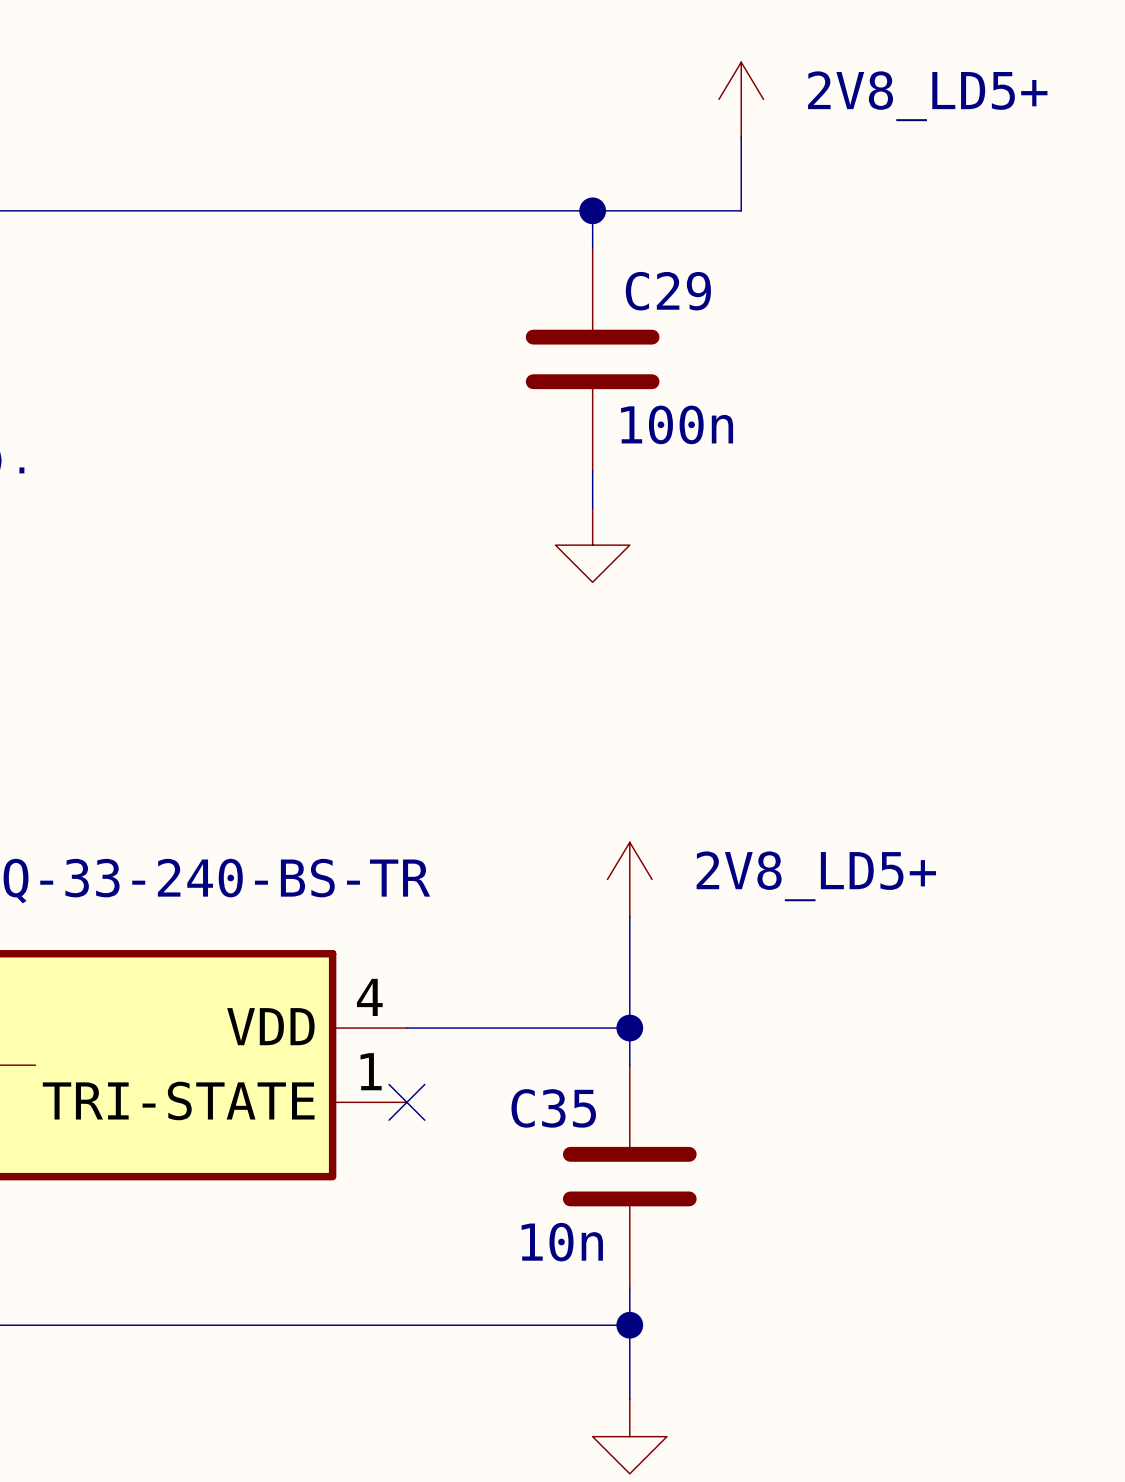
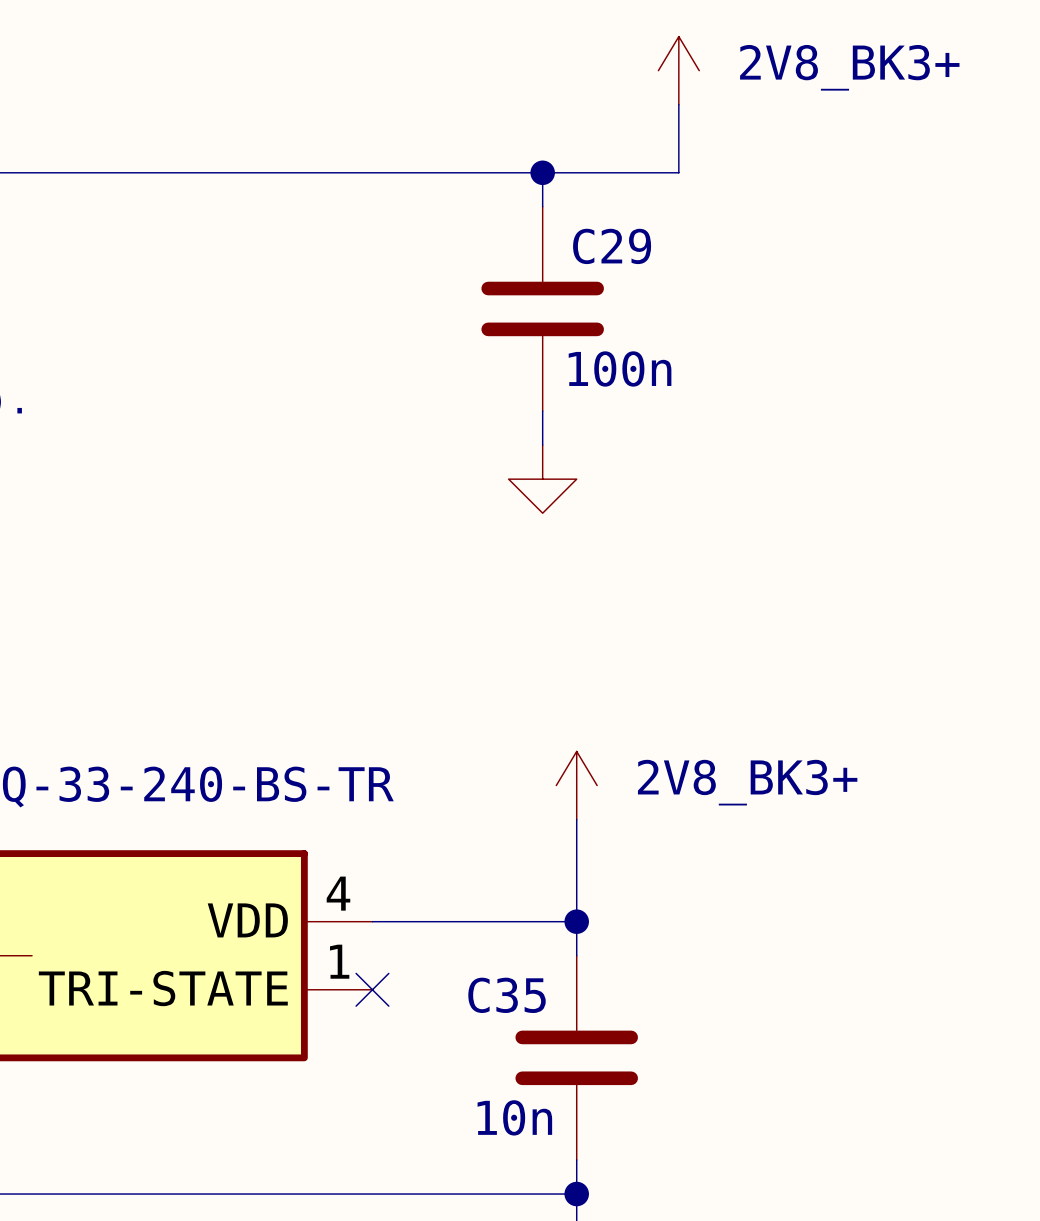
power symbol: 2V8_LD5+ (741, 99) -> 2V8_BK3+ (678, 70)
power symbol: 2V8_LD5+ (629, 879) -> 2V8_BK3+ (576, 785)

